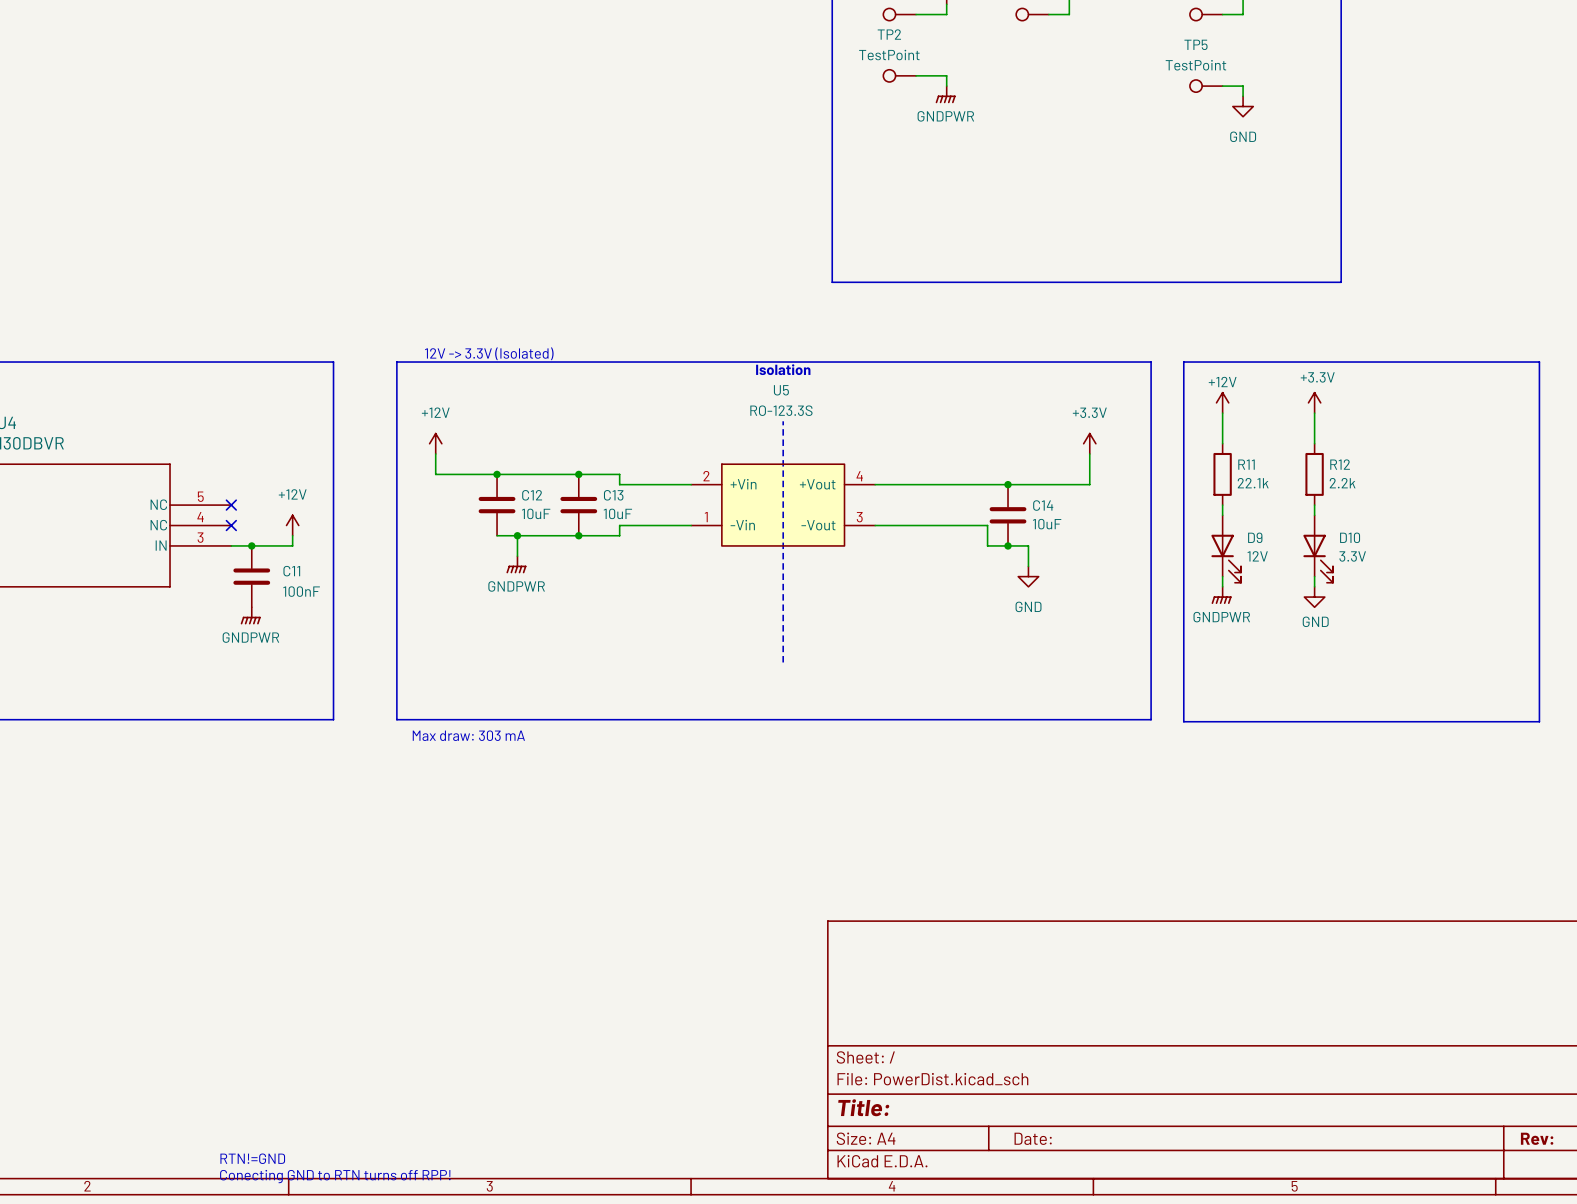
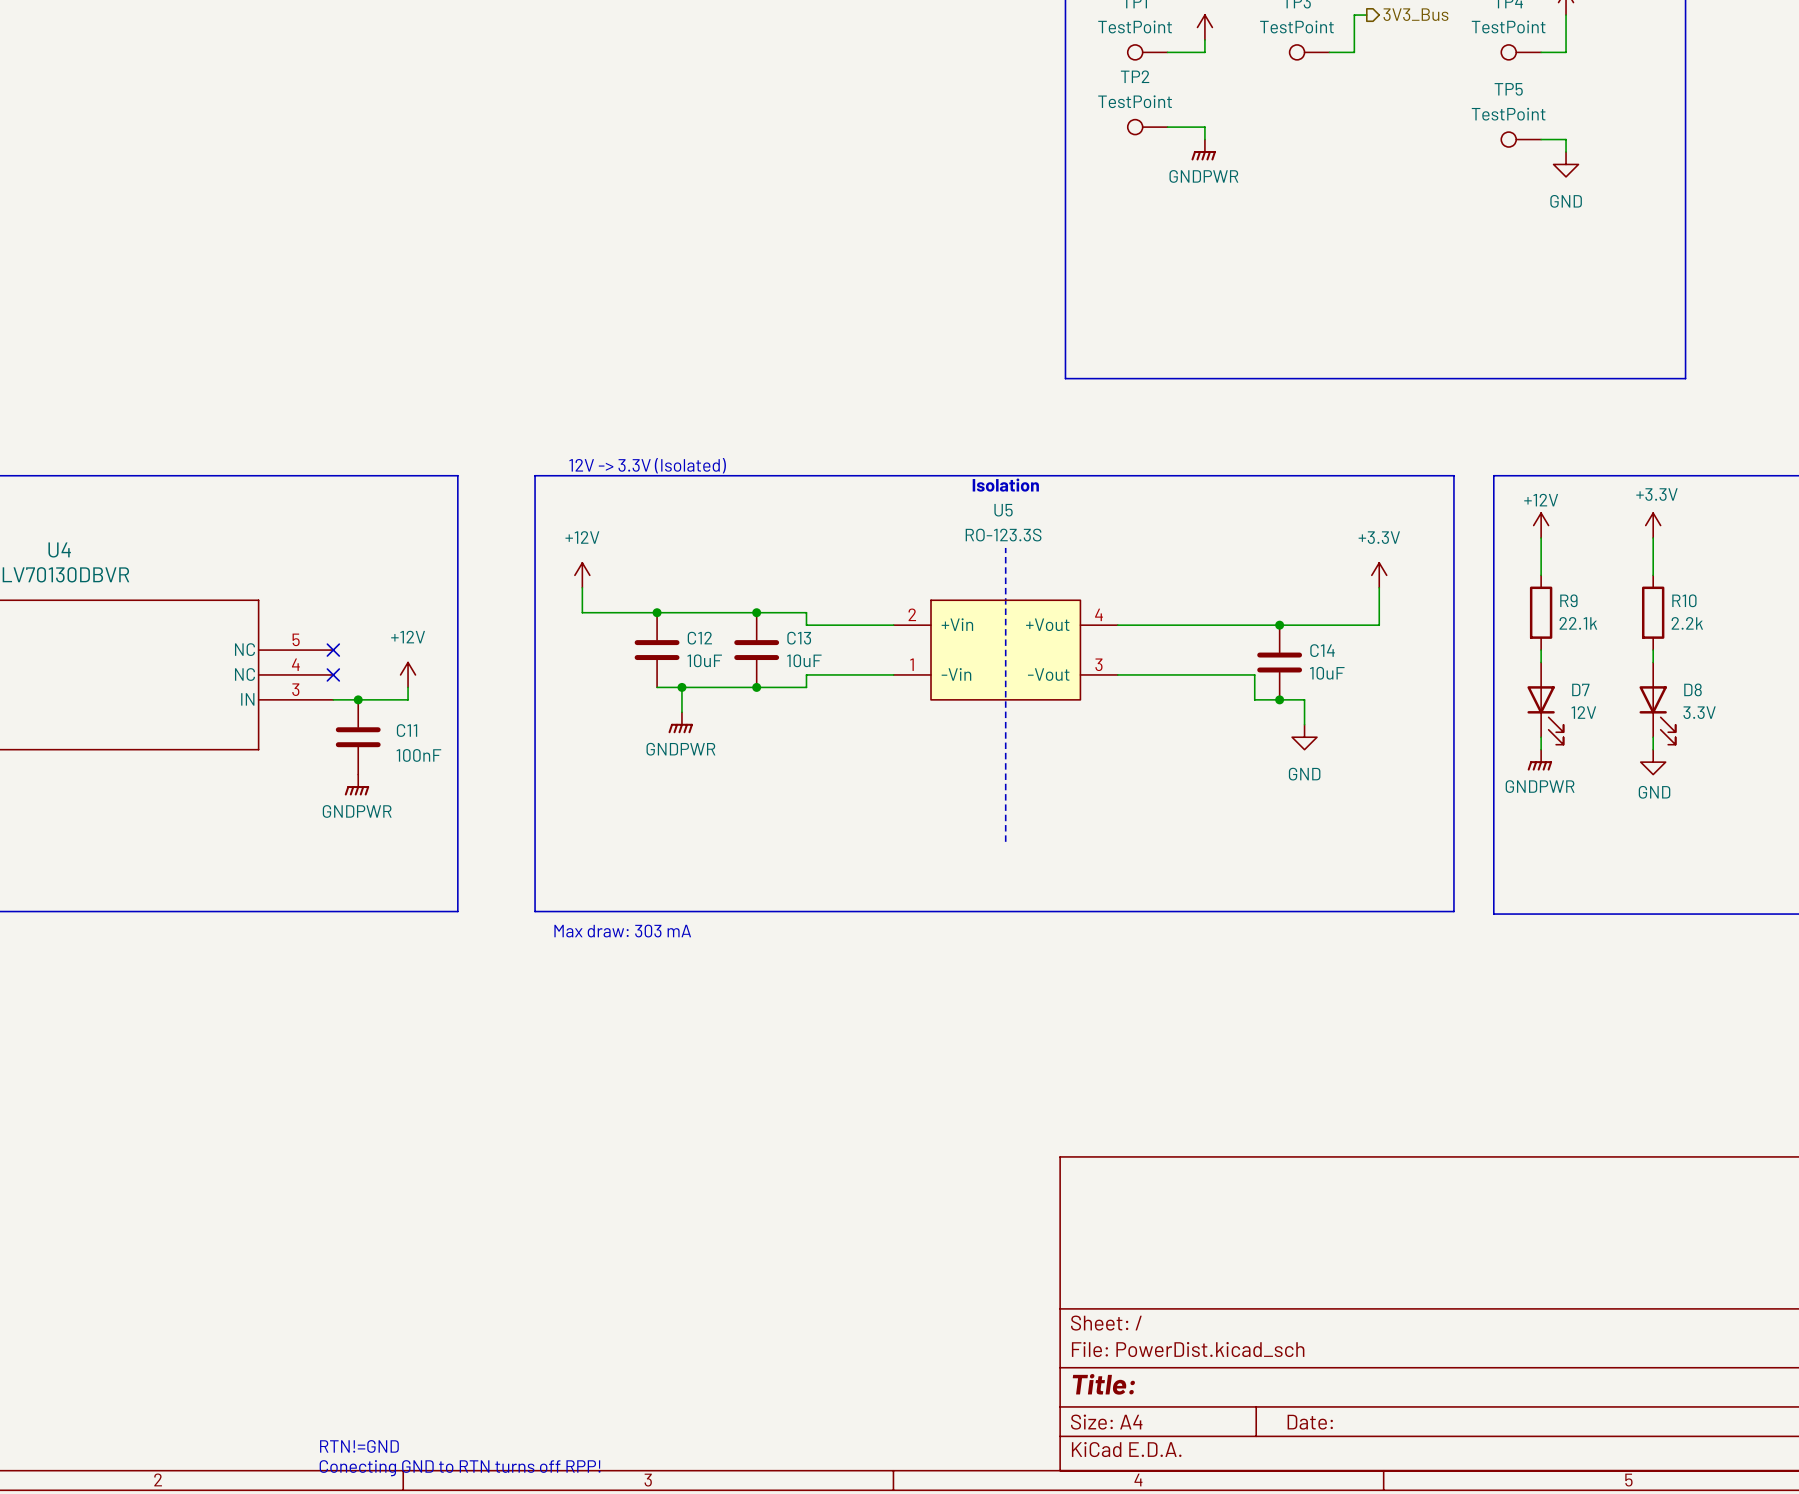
R11 name: R11 (1246, 464) -> R9 (1568, 600)
R12 name: R12 (1340, 464) -> R10 (1684, 600)
D9 name: D9 (1255, 537) -> D7 (1580, 689)
D10 name: D10 (1350, 537) -> D8 (1692, 689)

